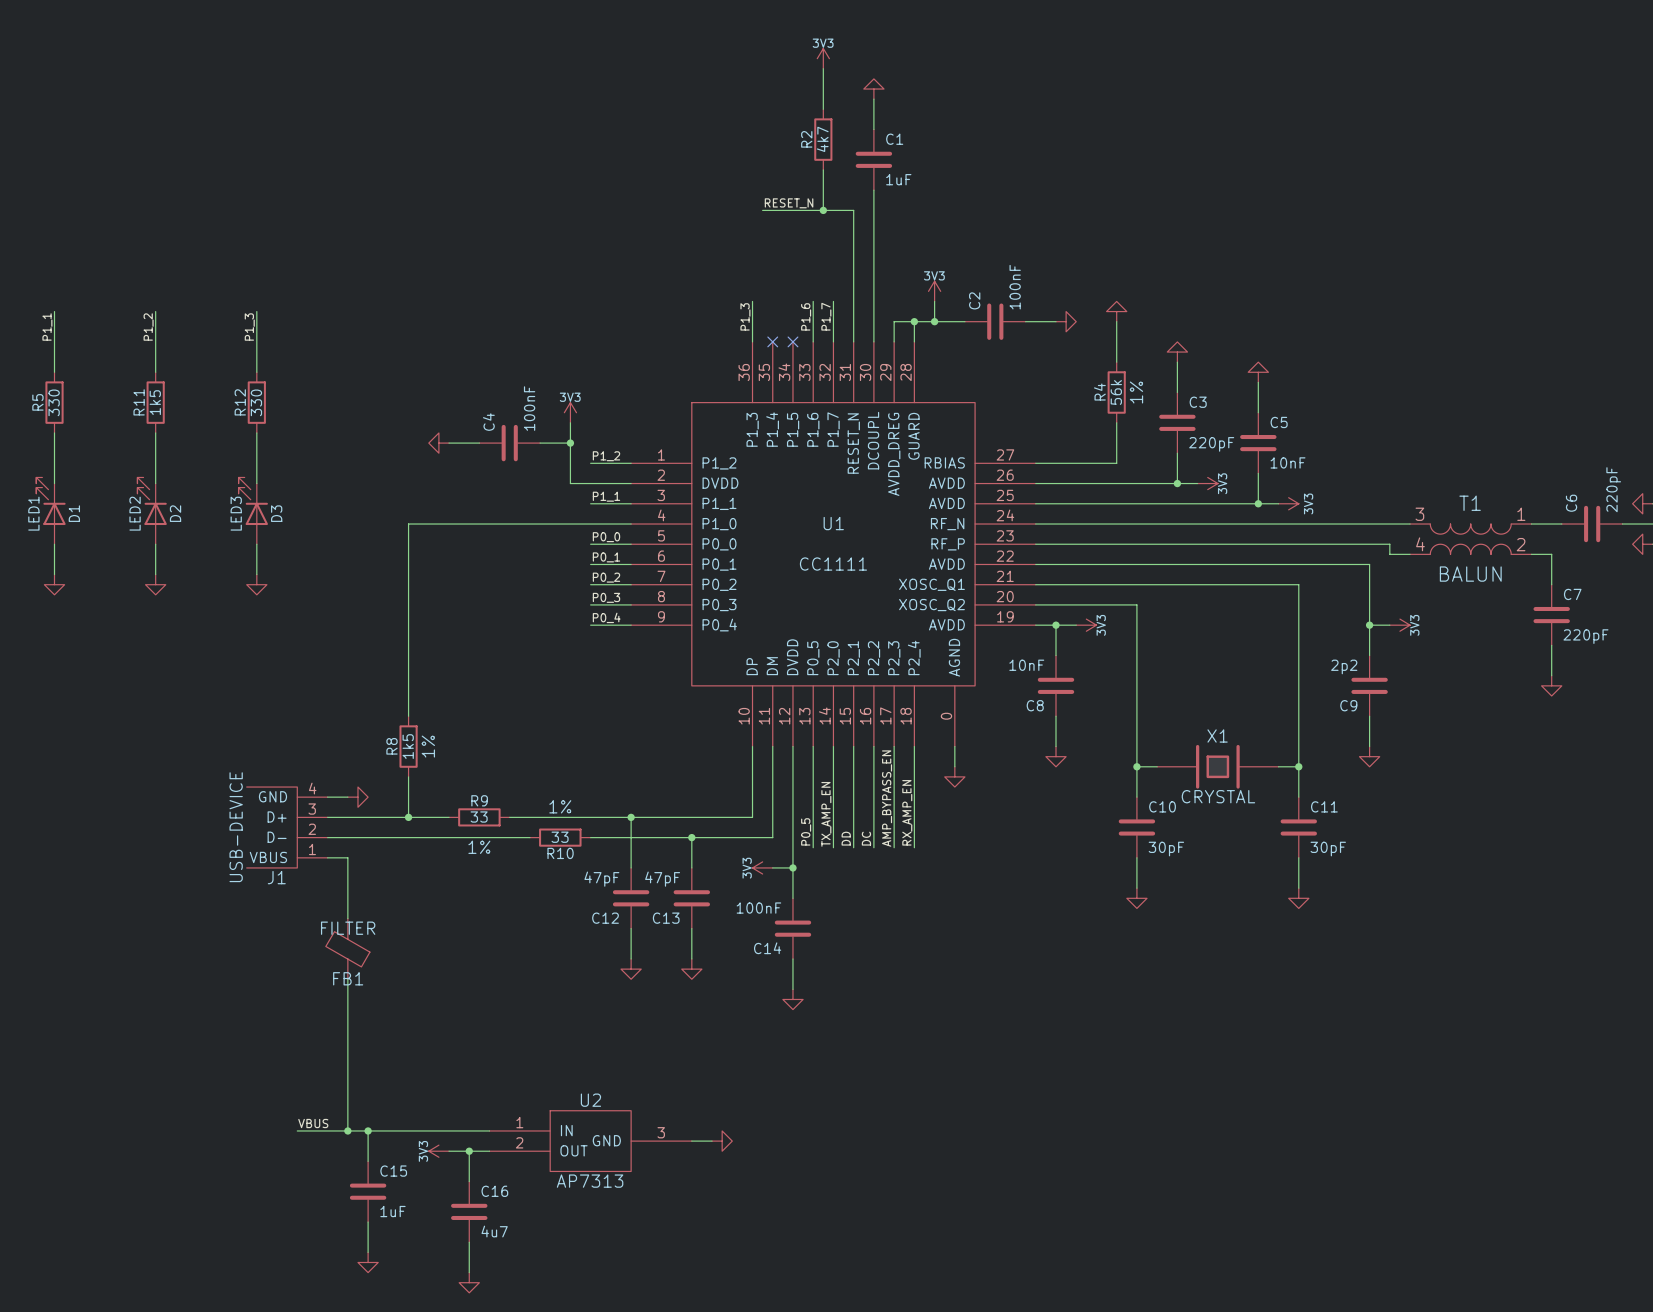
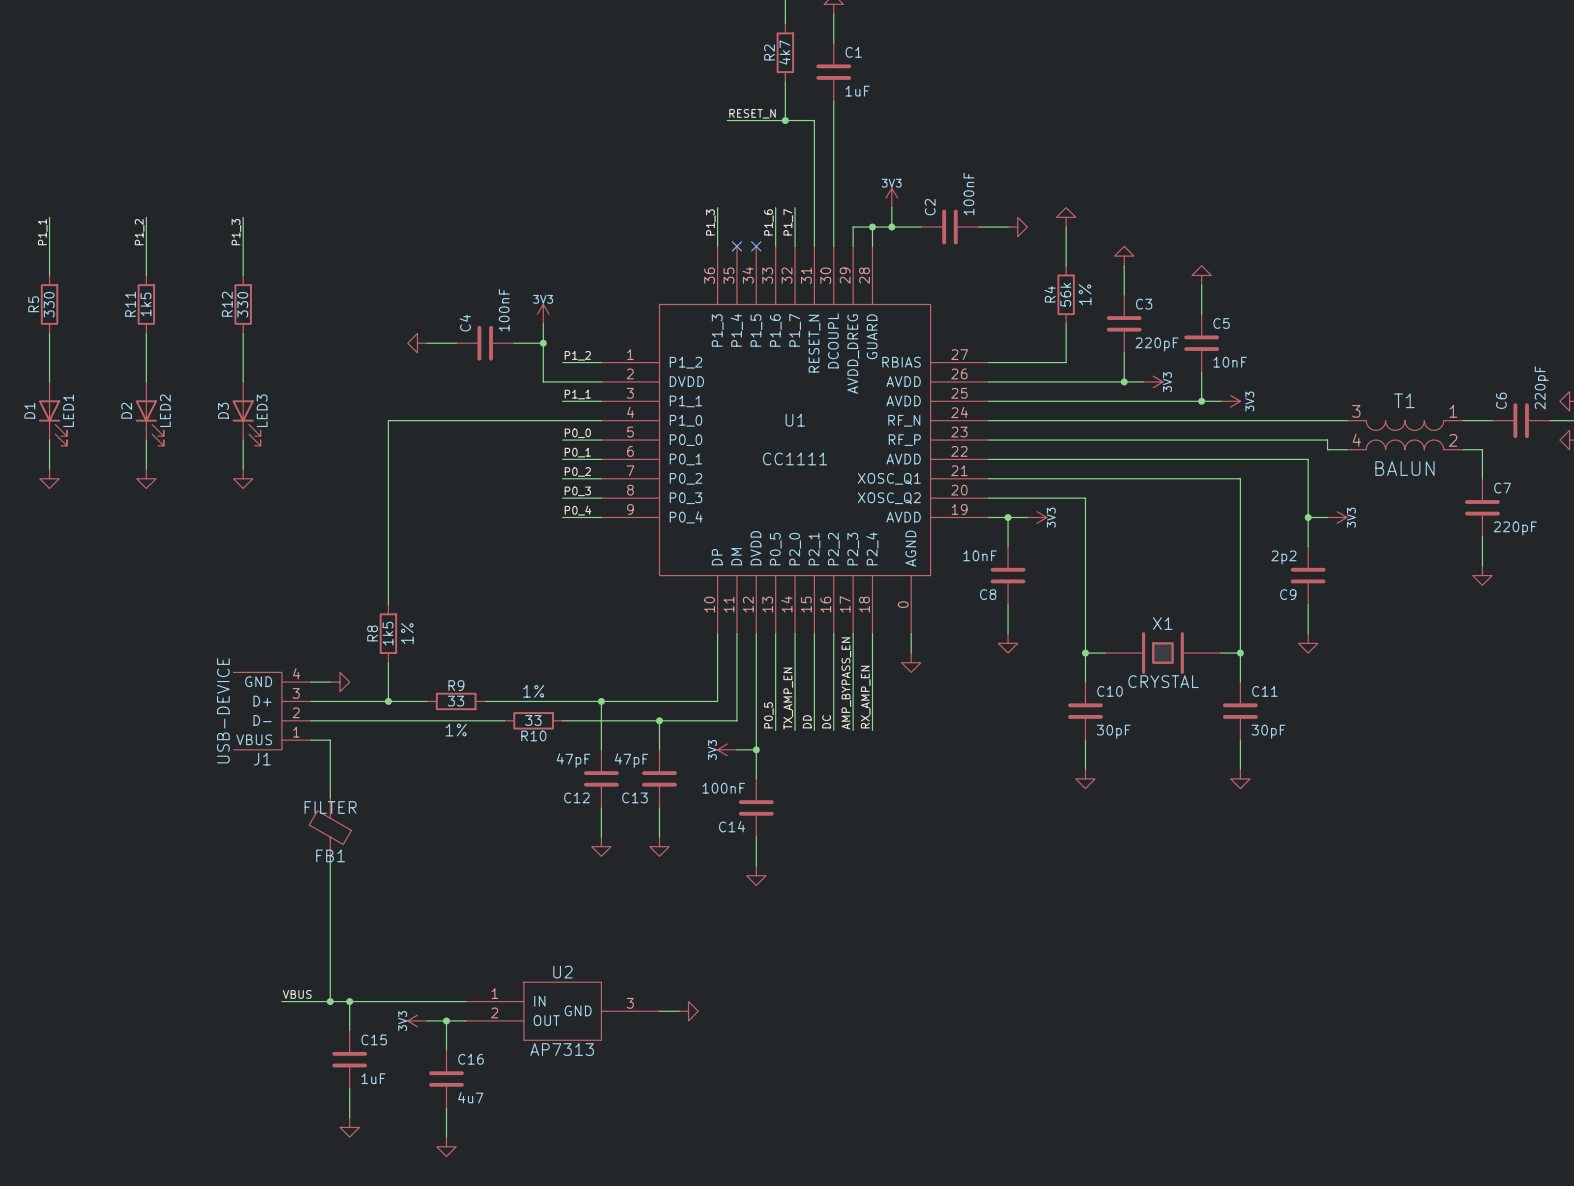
D1 rotation: 0° (50, 501) -> 180° (52, 423)
D2 rotation: 0° (152, 501) -> 180° (149, 423)
D3 rotation: 0° (253, 501) -> 180° (246, 423)

